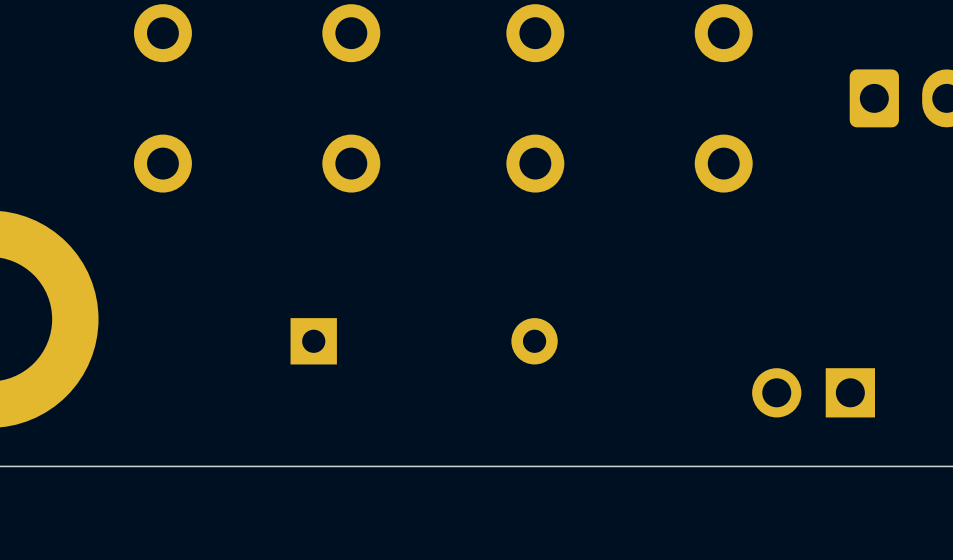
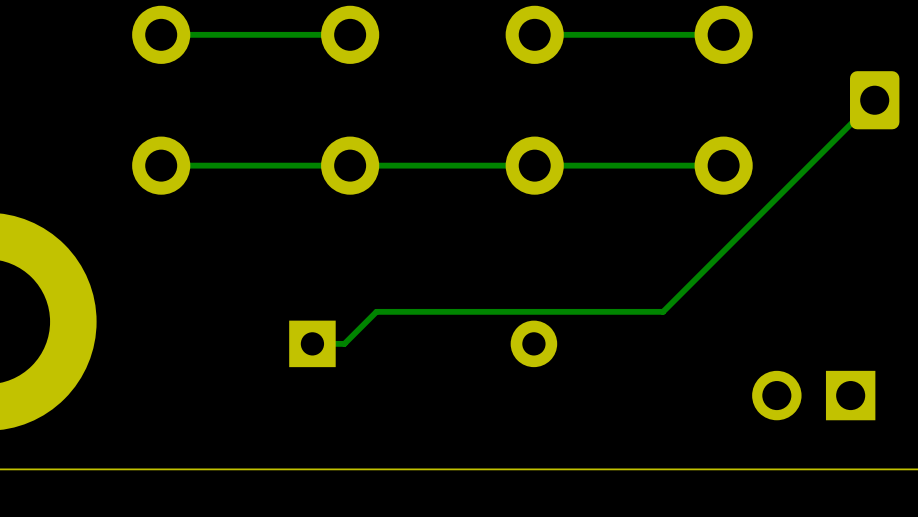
track: none -> (350, 34) (161, 34)
track: none -> (723, 34) (534, 34)
track: none -> (874, 100) (663, 311) (376, 311) (344, 343) (312, 343)
track: none -> (723, 165) (161, 165)

